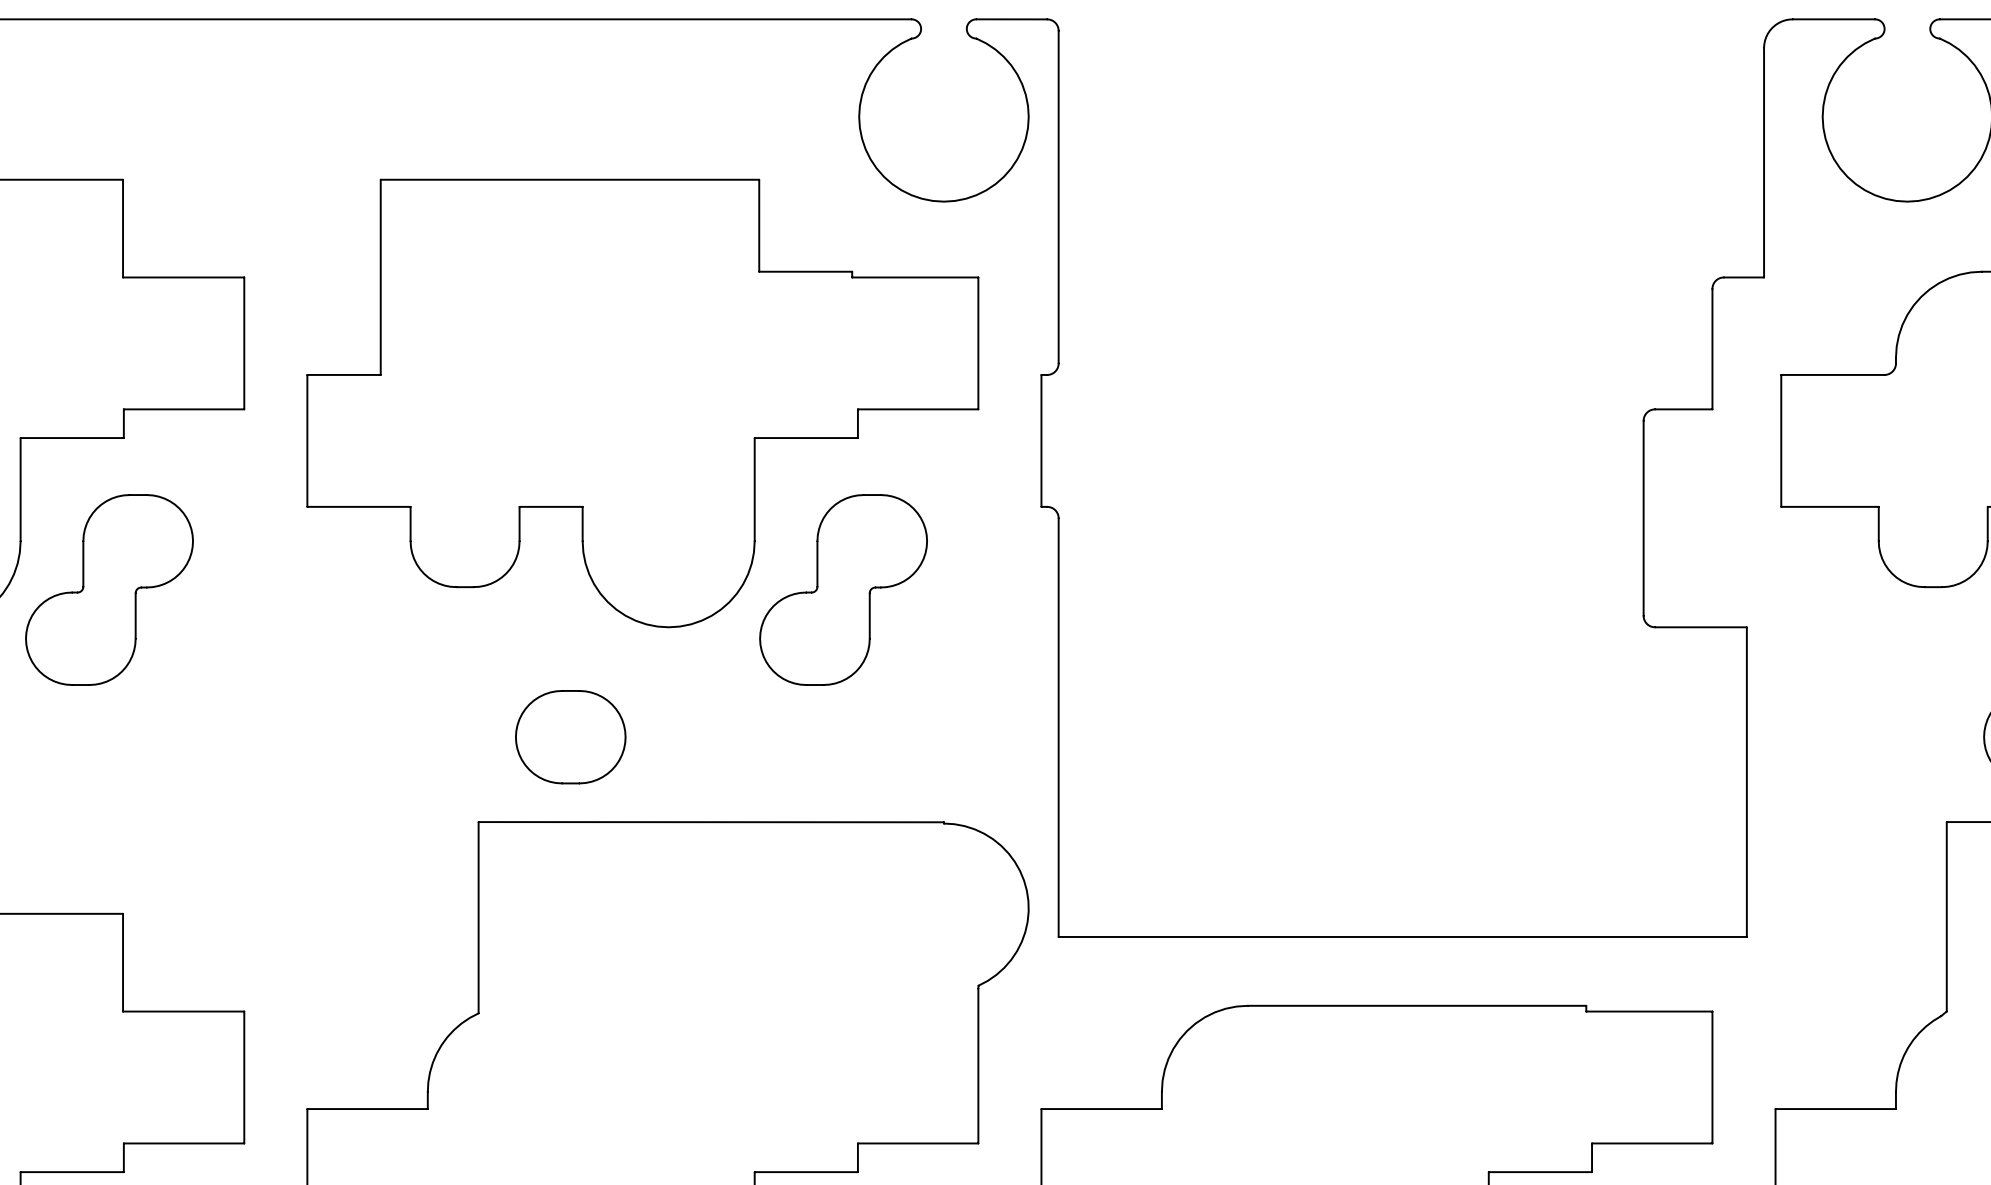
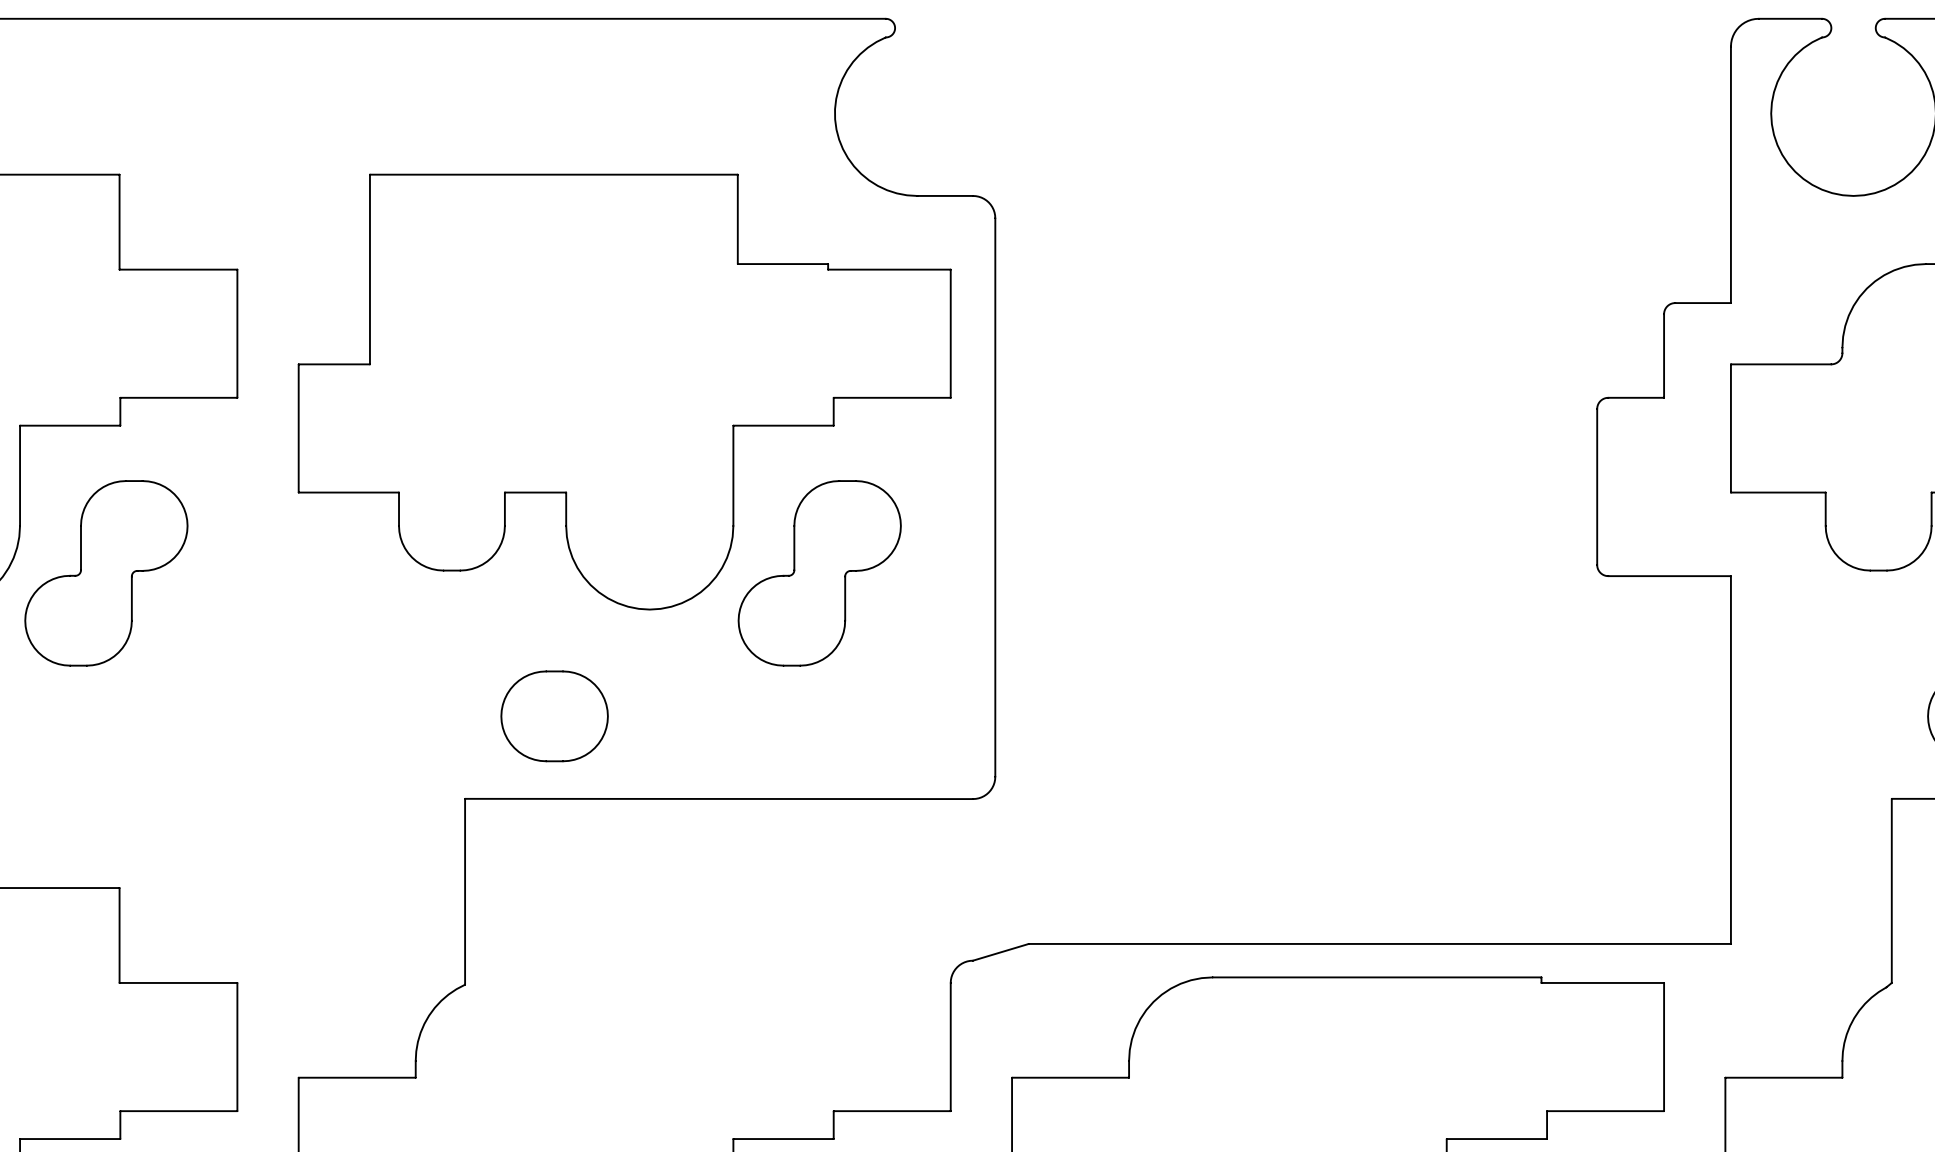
board edge: (1809, 19) (1781, 21) (1770, 30) (1765, 40) (1764, 277) (1722, 277) (1715, 280) (1712, 287) (1712, 323) -> (1758, 18) (1741, 24) (1734, 32) (1731, 43) (1730, 303) (1673, 303) (1667, 306) (1664, 314)
board edge: (911, 38) (892, 49) (870, 74) (862, 94) (859, 127) (870, 159) (892, 184) (922, 198) (943, 201) (976, 195) (1003, 176) (1017, 159) (1028, 127) (1028, 105) (1017, 74) (995, 49) (969, 35) (966, 30) (968, 24) (976, 19) (1047, 19) (1055, 22) (1058, 29) (1058, 363) (1057, 369) (1052, 373) (1041, 374) (1041, 506) (1052, 508) (1057, 512) (1058, 518) (1058, 936) (1746, 936) (1746, 627) (1650, 626) (1646, 622) (1643, 617) (1643, 581) -> (885, 37) (860, 54) (847, 70) (838, 88) (835, 109) (836, 129) (848, 158) (861, 173) (887, 190) (907, 195) (978, 196) (990, 204) (995, 218) (995, 779) (990, 790) (978, 798) (917, 799)
board edge: (943, 822) (974, 829) (1001, 845) (1014, 861) (1026, 890) (1027, 921) (1021, 941) (1004, 967) (978, 985) (978, 1011) -> (1597, 565) (1599, 571) (1606, 576) (1730, 576) (1730, 943) (1028, 943) (961, 963) (953, 971) (950, 982)

